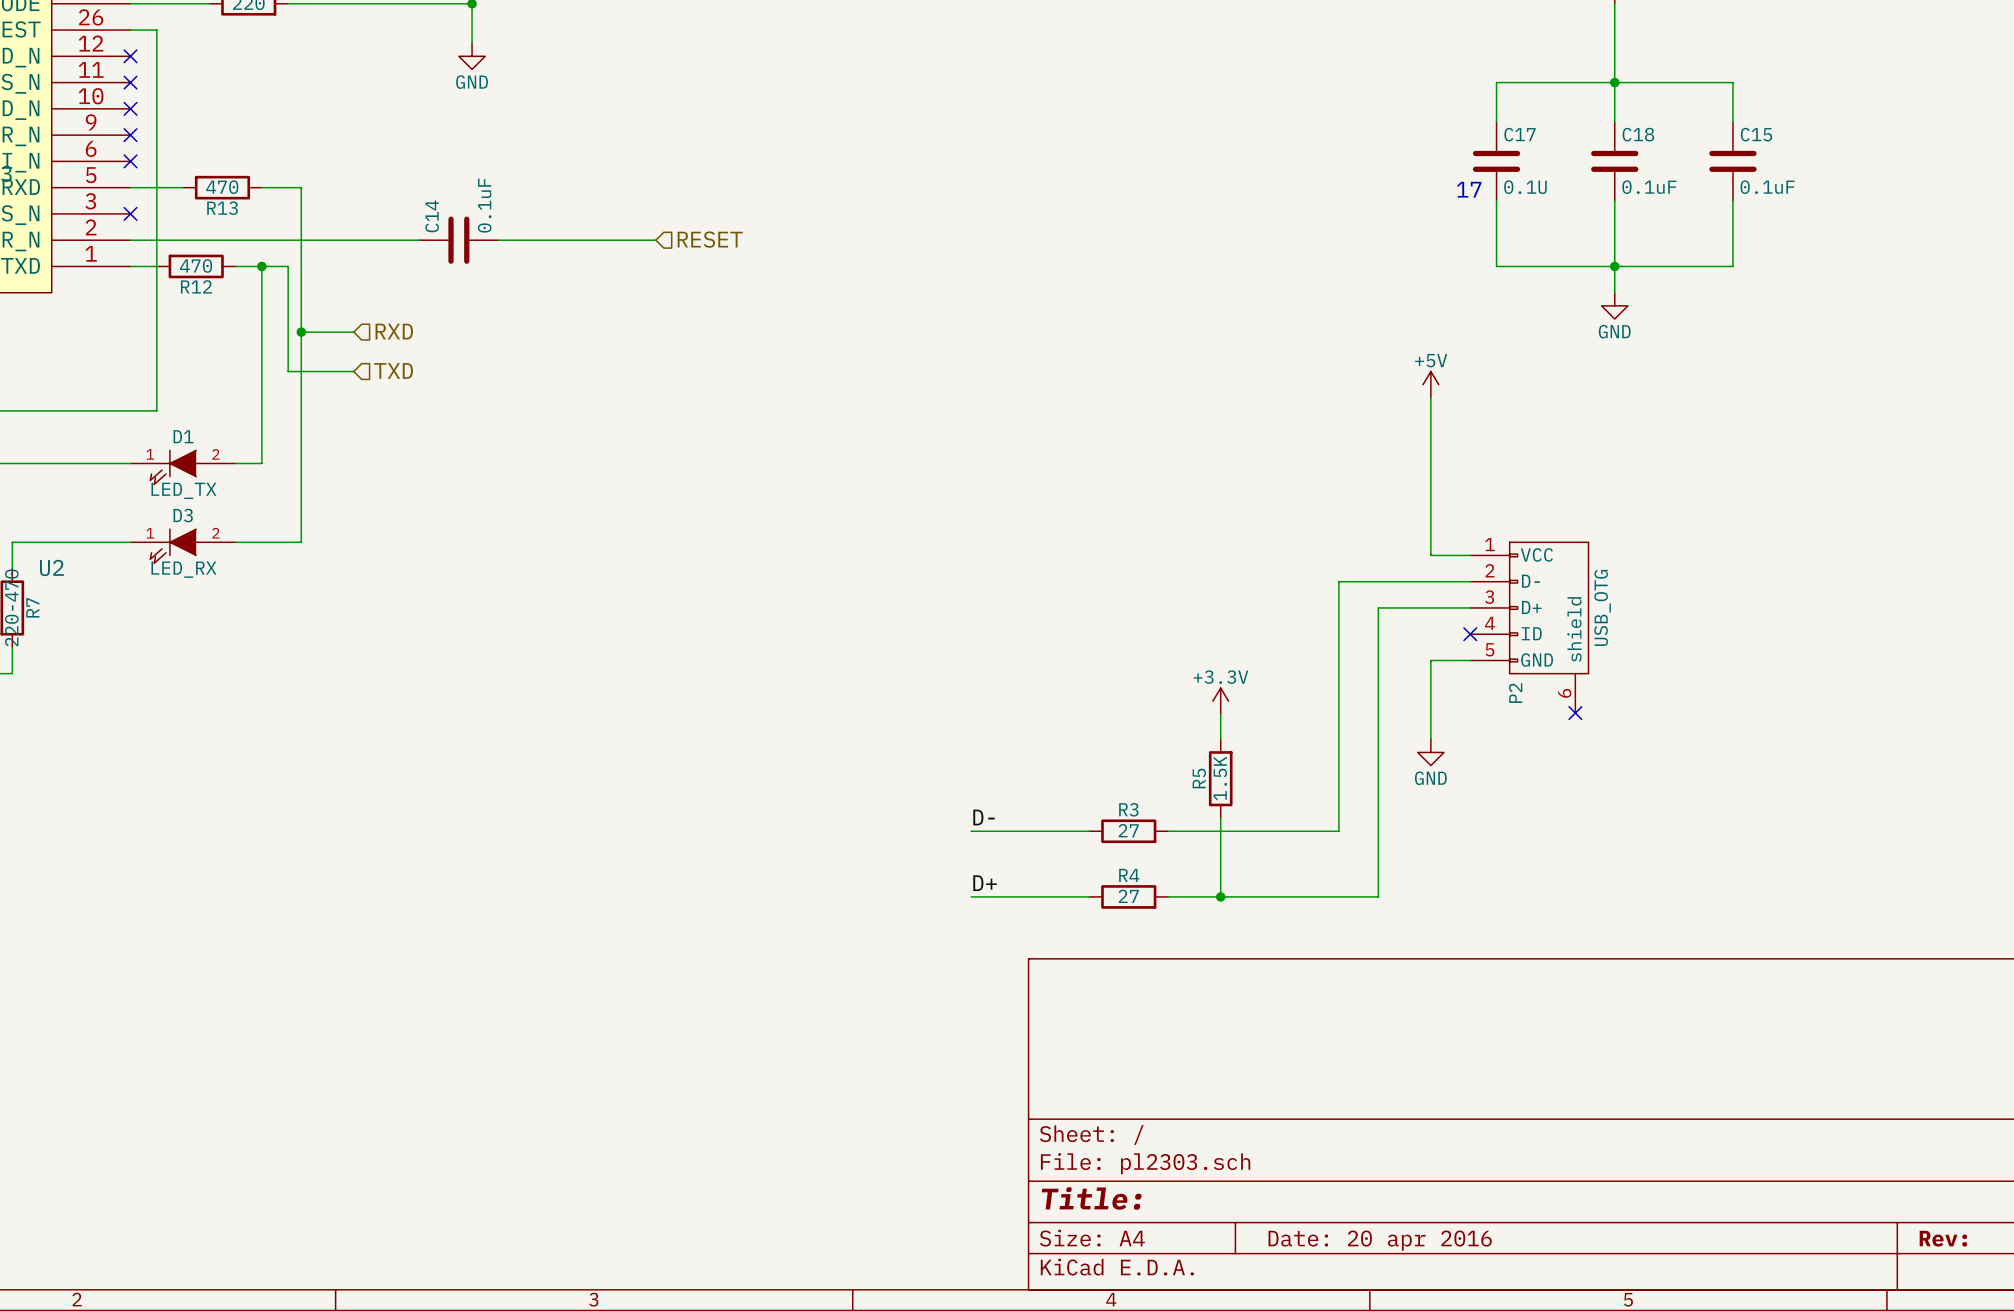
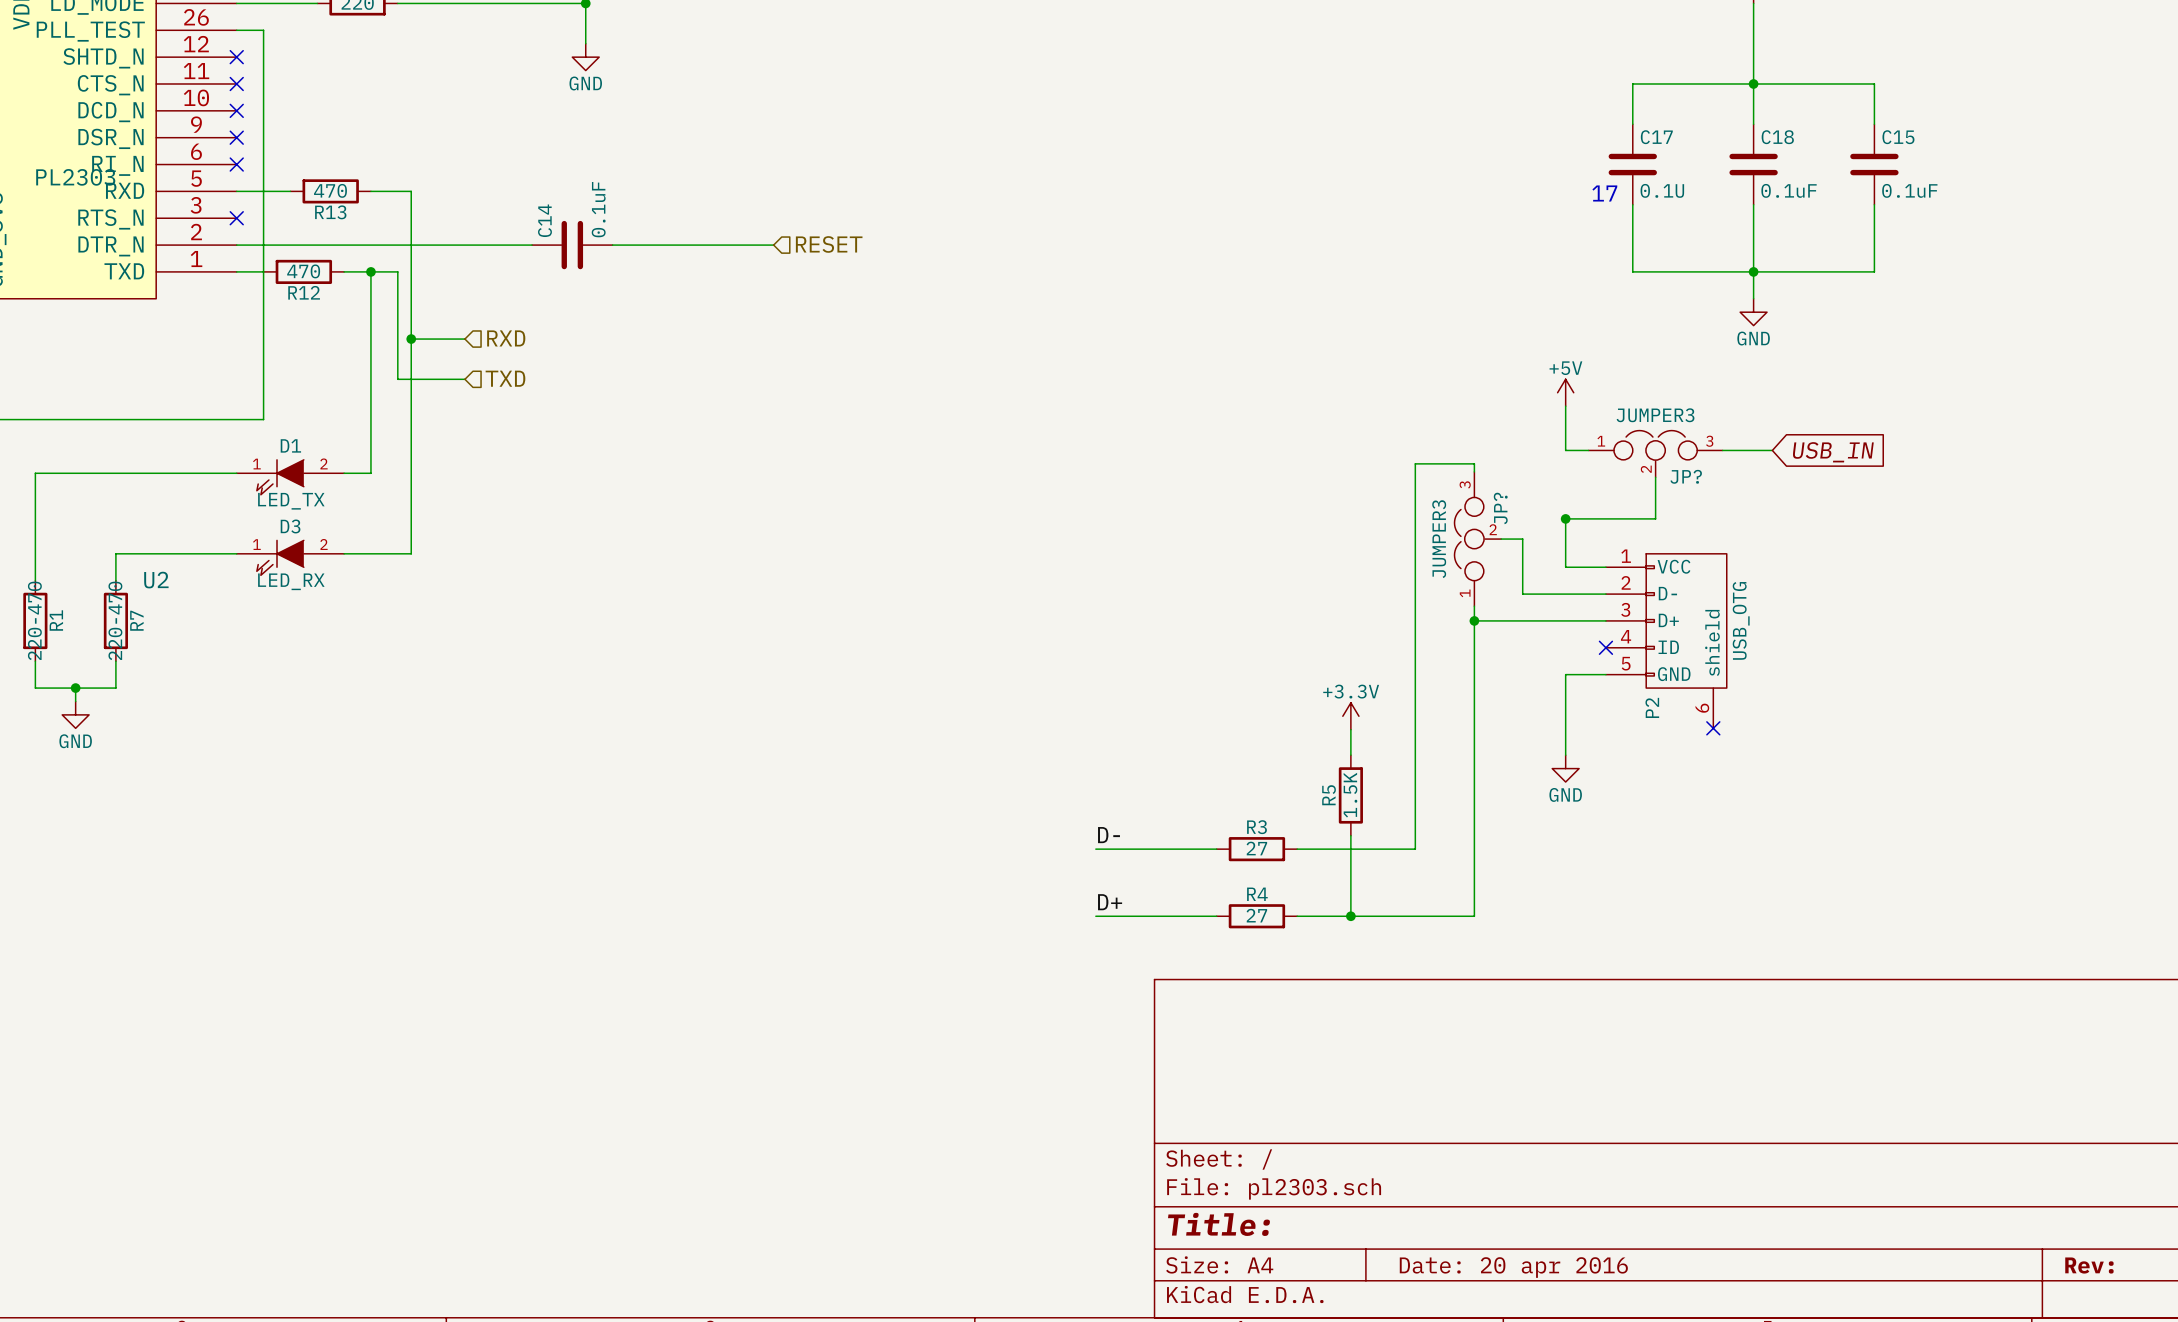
wire: (1430, 441) (1430, 508) -> (1565, 450) (1588, 450)
wire: none -> (1722, 450) (1772, 450)
global label: none -> USB_IN (1833, 452)
JP?: none -> JUMPER3 (1655, 453)
wire: none -> (1655, 477) (1655, 518) (1565, 518)
junction: none -> (1565, 518)
JP?: none -> JUMPER3 (1477, 539)
wire: none -> (1501, 539) (1522, 539) (1522, 594)
wire: (1388, 581) (1338, 581) (1338, 831) (1283, 831) -> (1474, 471) (1474, 463) (1415, 463) (1415, 849)
wire: none -> (1474, 620) (1511, 620)
junction: none -> (1474, 620)
wire: (1378, 607) (1378, 896) (1341, 896) -> (1474, 606) (1474, 916)

